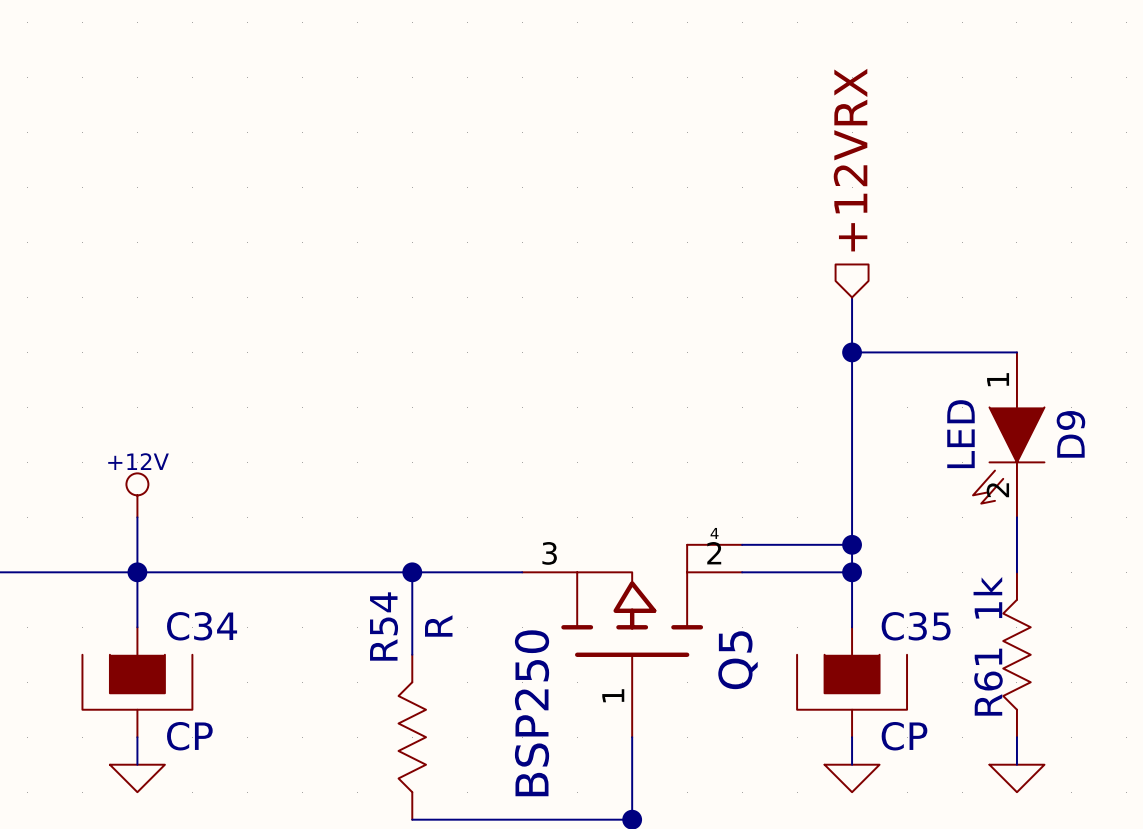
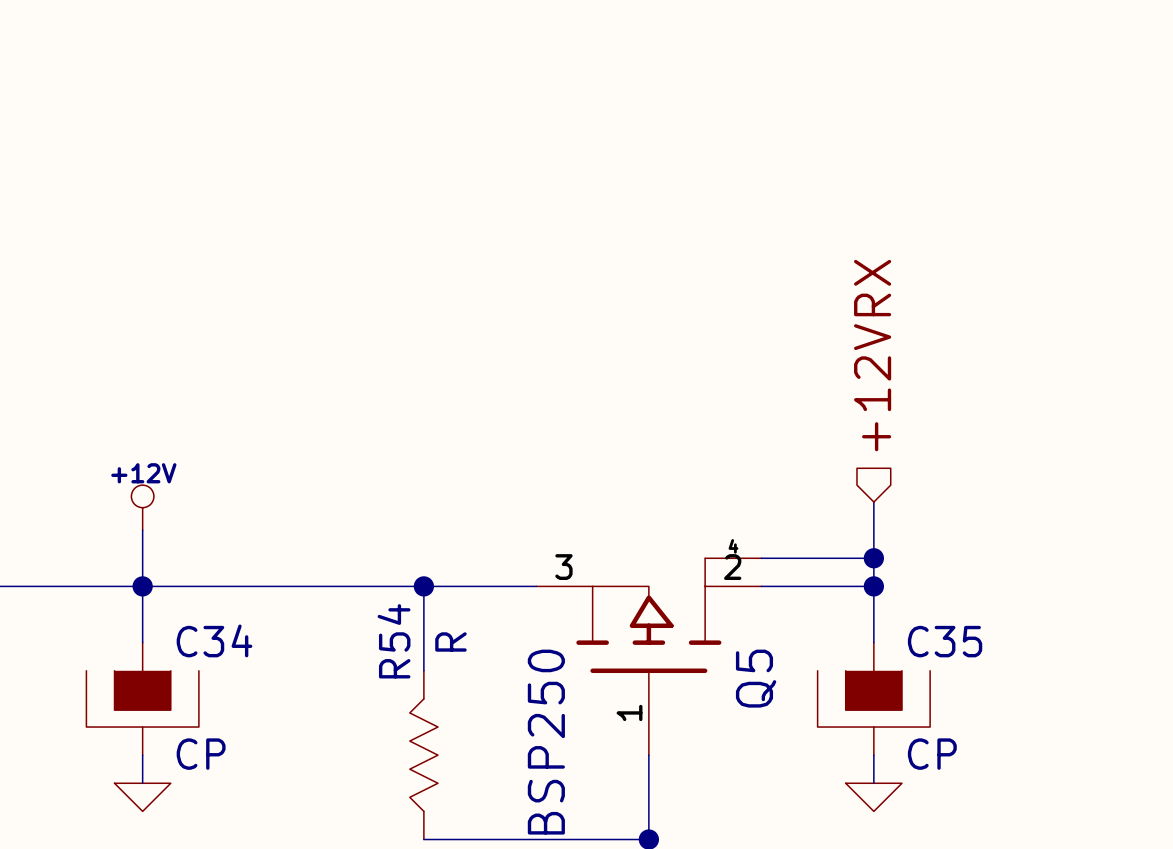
hierarchical label position: +12VRX (850, 160) -> +12VRX (872, 355)
wire: (852, 297) (852, 489) -> none
wire: (852, 352) (1016, 352) -> none
junction: (852, 352) -> none
D9: LED (1008, 434) -> none
wire: (1016, 517) (1016, 572) -> none
R61: 1k (1016, 654) -> none
wire: (1016, 737) (1016, 764) -> none
power symbol: (1016, 778) -> none

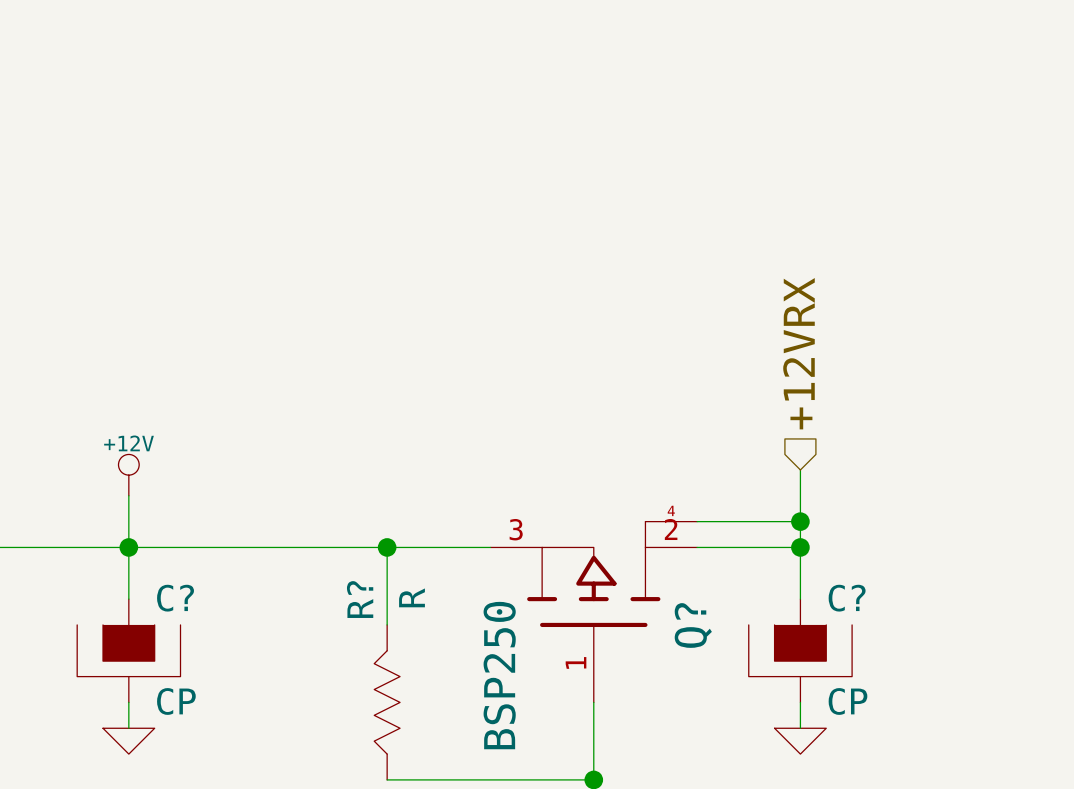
C34 name: C34 (214, 640) -> C? (175, 598)
R54 name: R54 (394, 641) -> R? (360, 599)
C35 name: C35 (945, 641) -> C? (847, 598)
Q5 name: Q5 (756, 678) -> Q? (693, 625)

